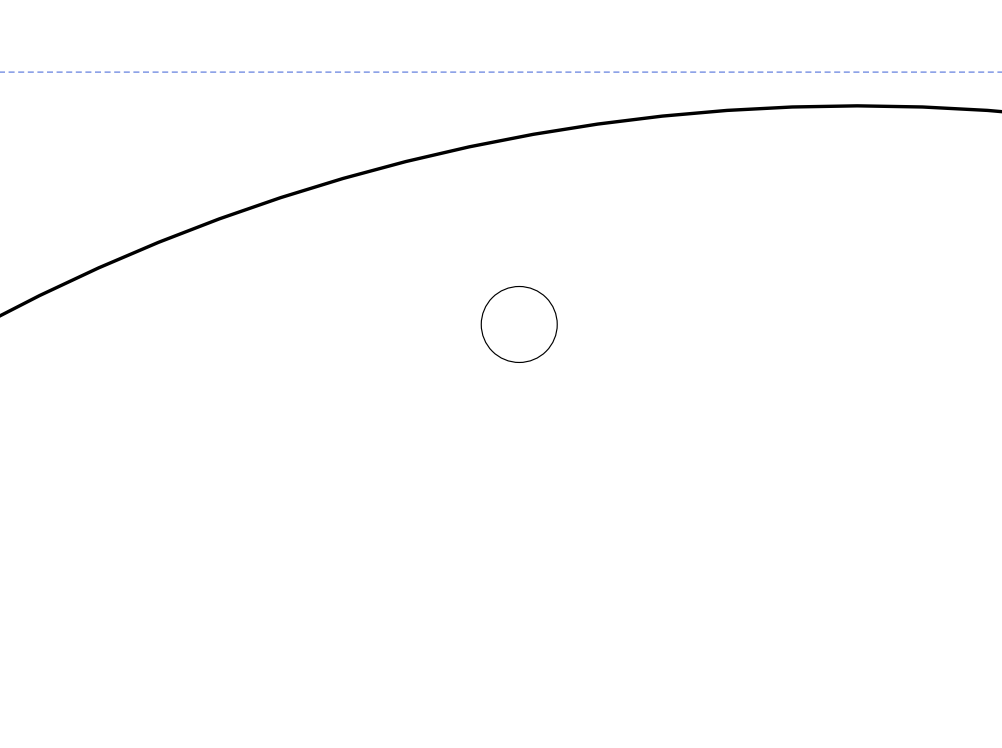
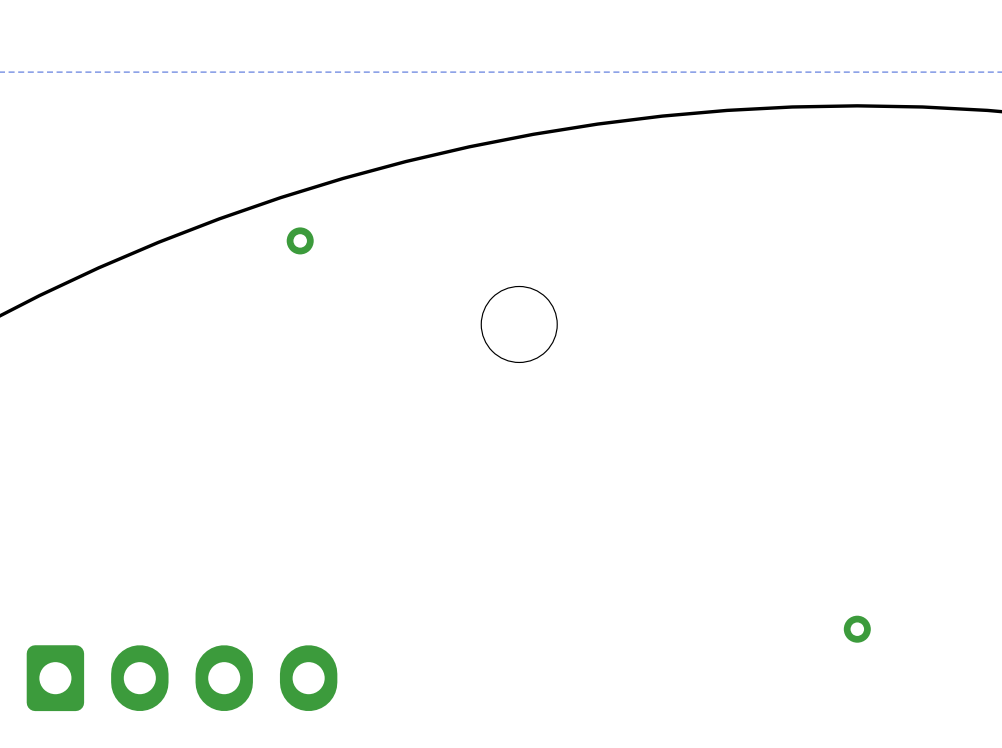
via: none -> (300, 240)
via: none -> (857, 629)
part: none -> (182, 678)

